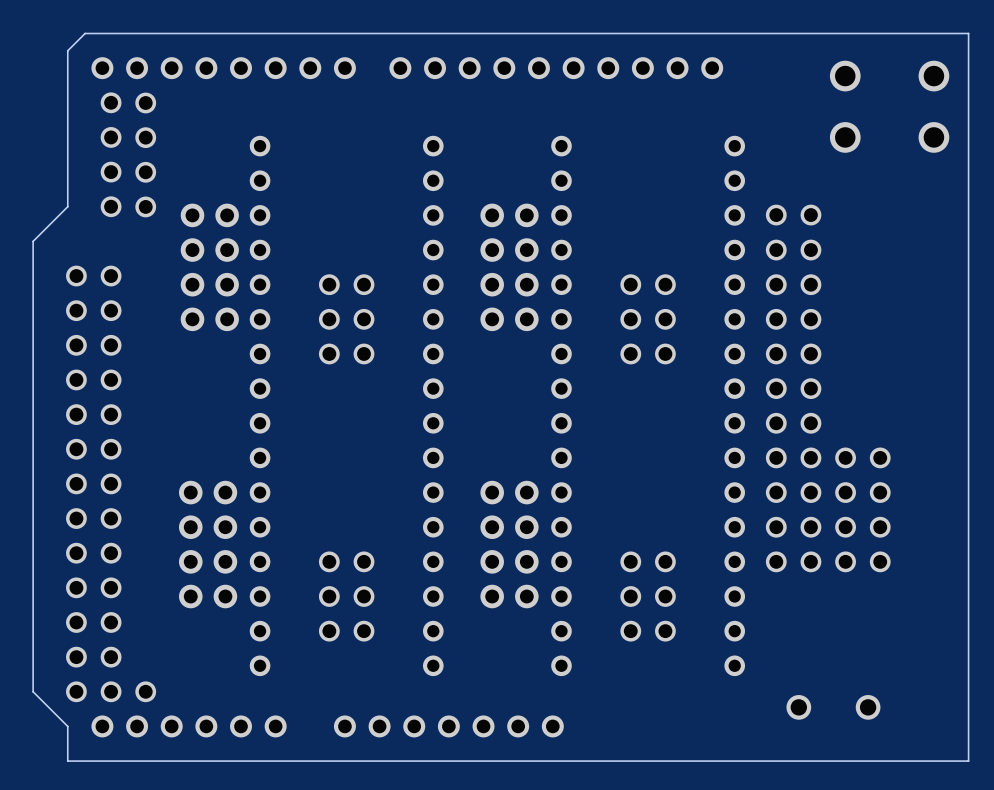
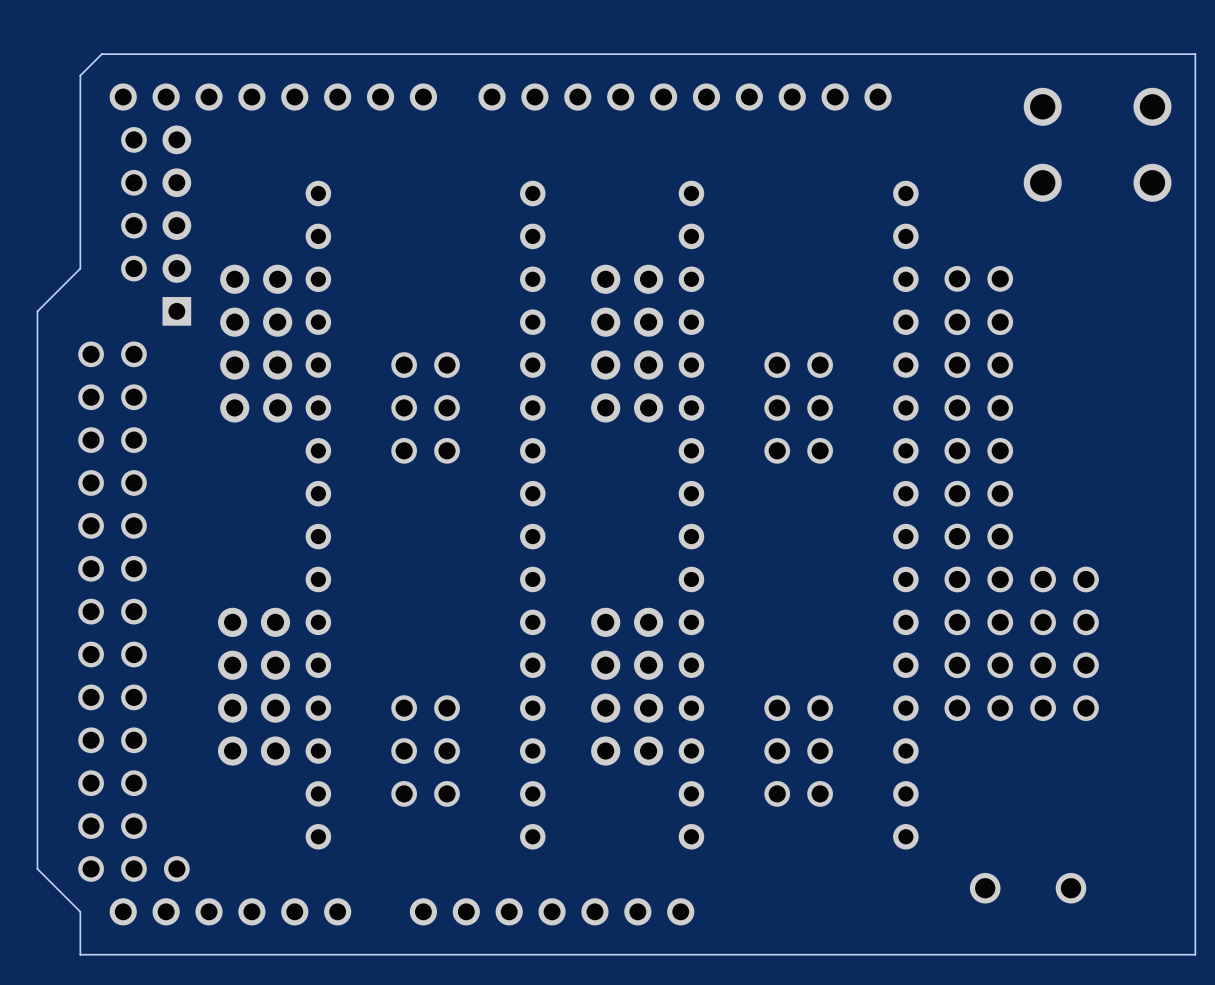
part: (145, 154) -> none
part: none -> (176, 225)

